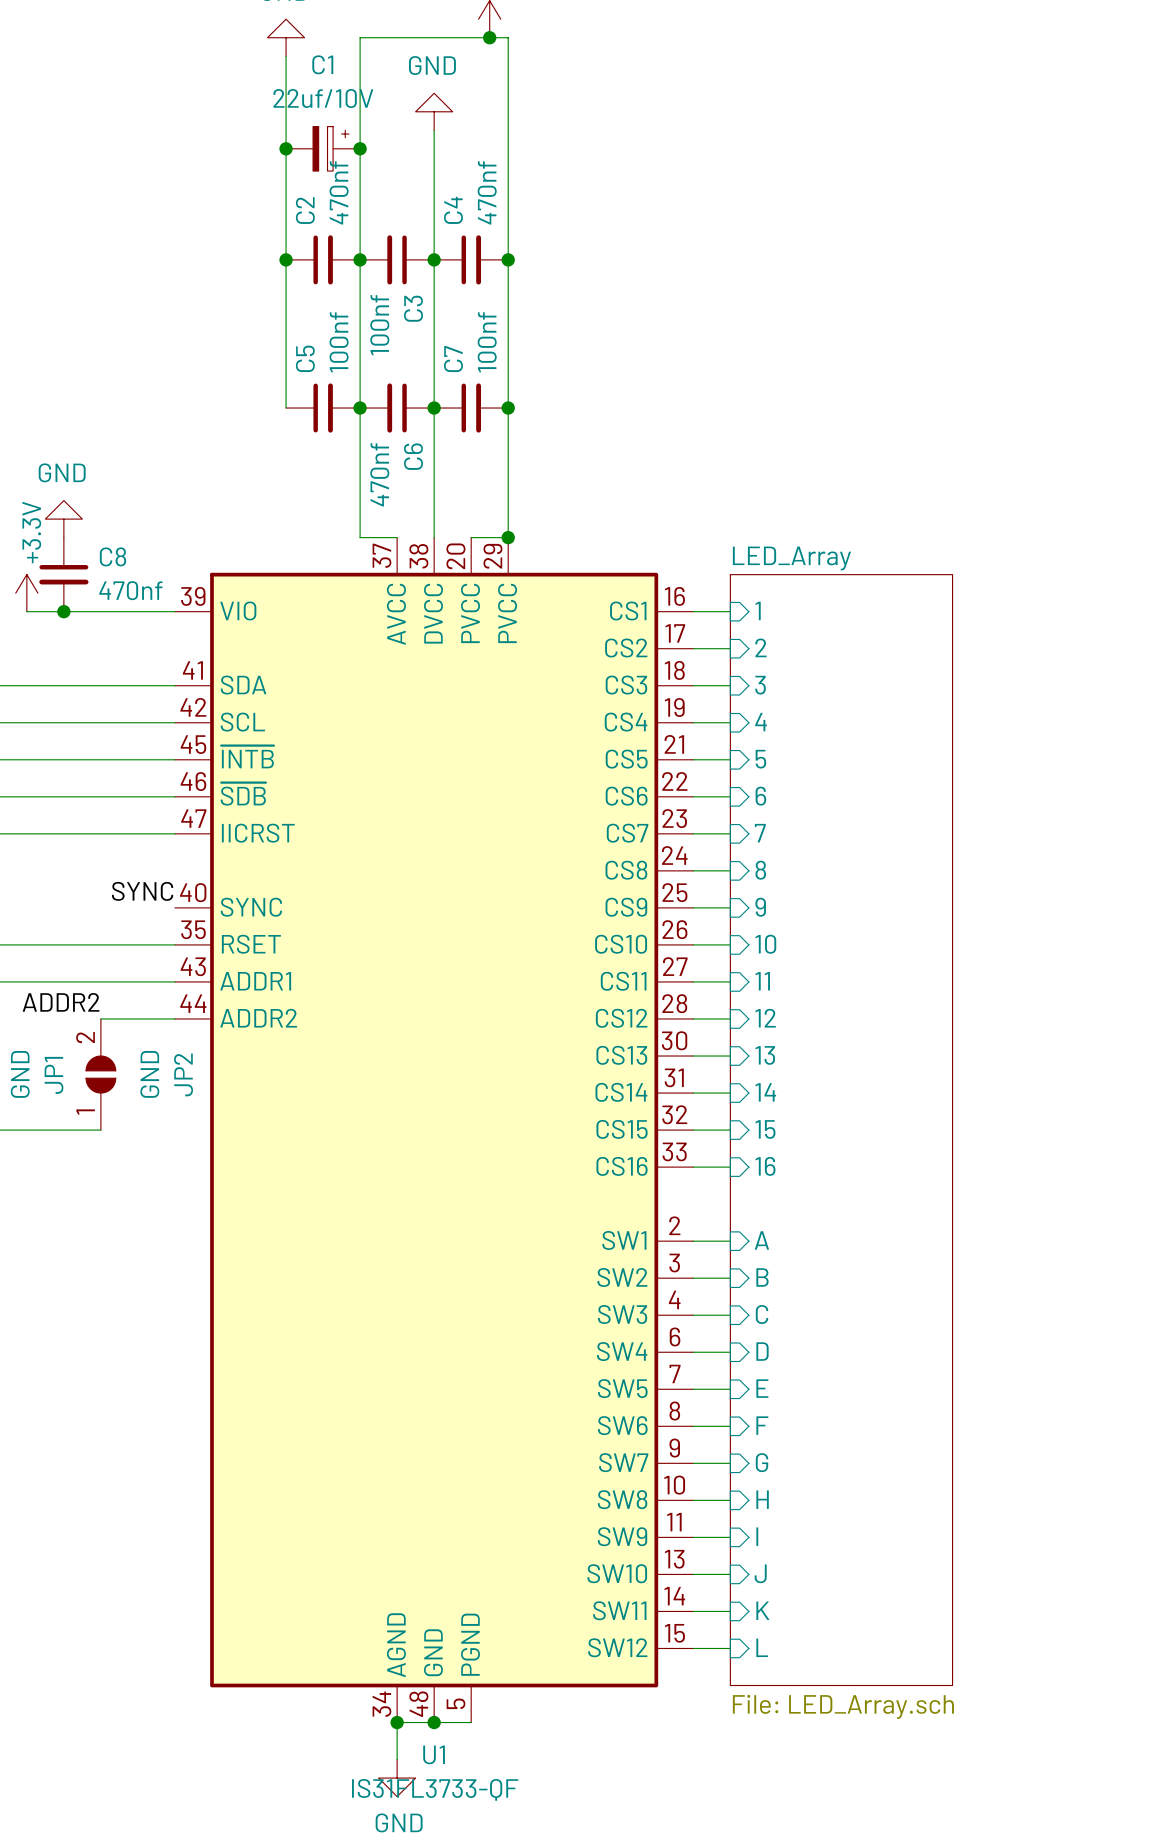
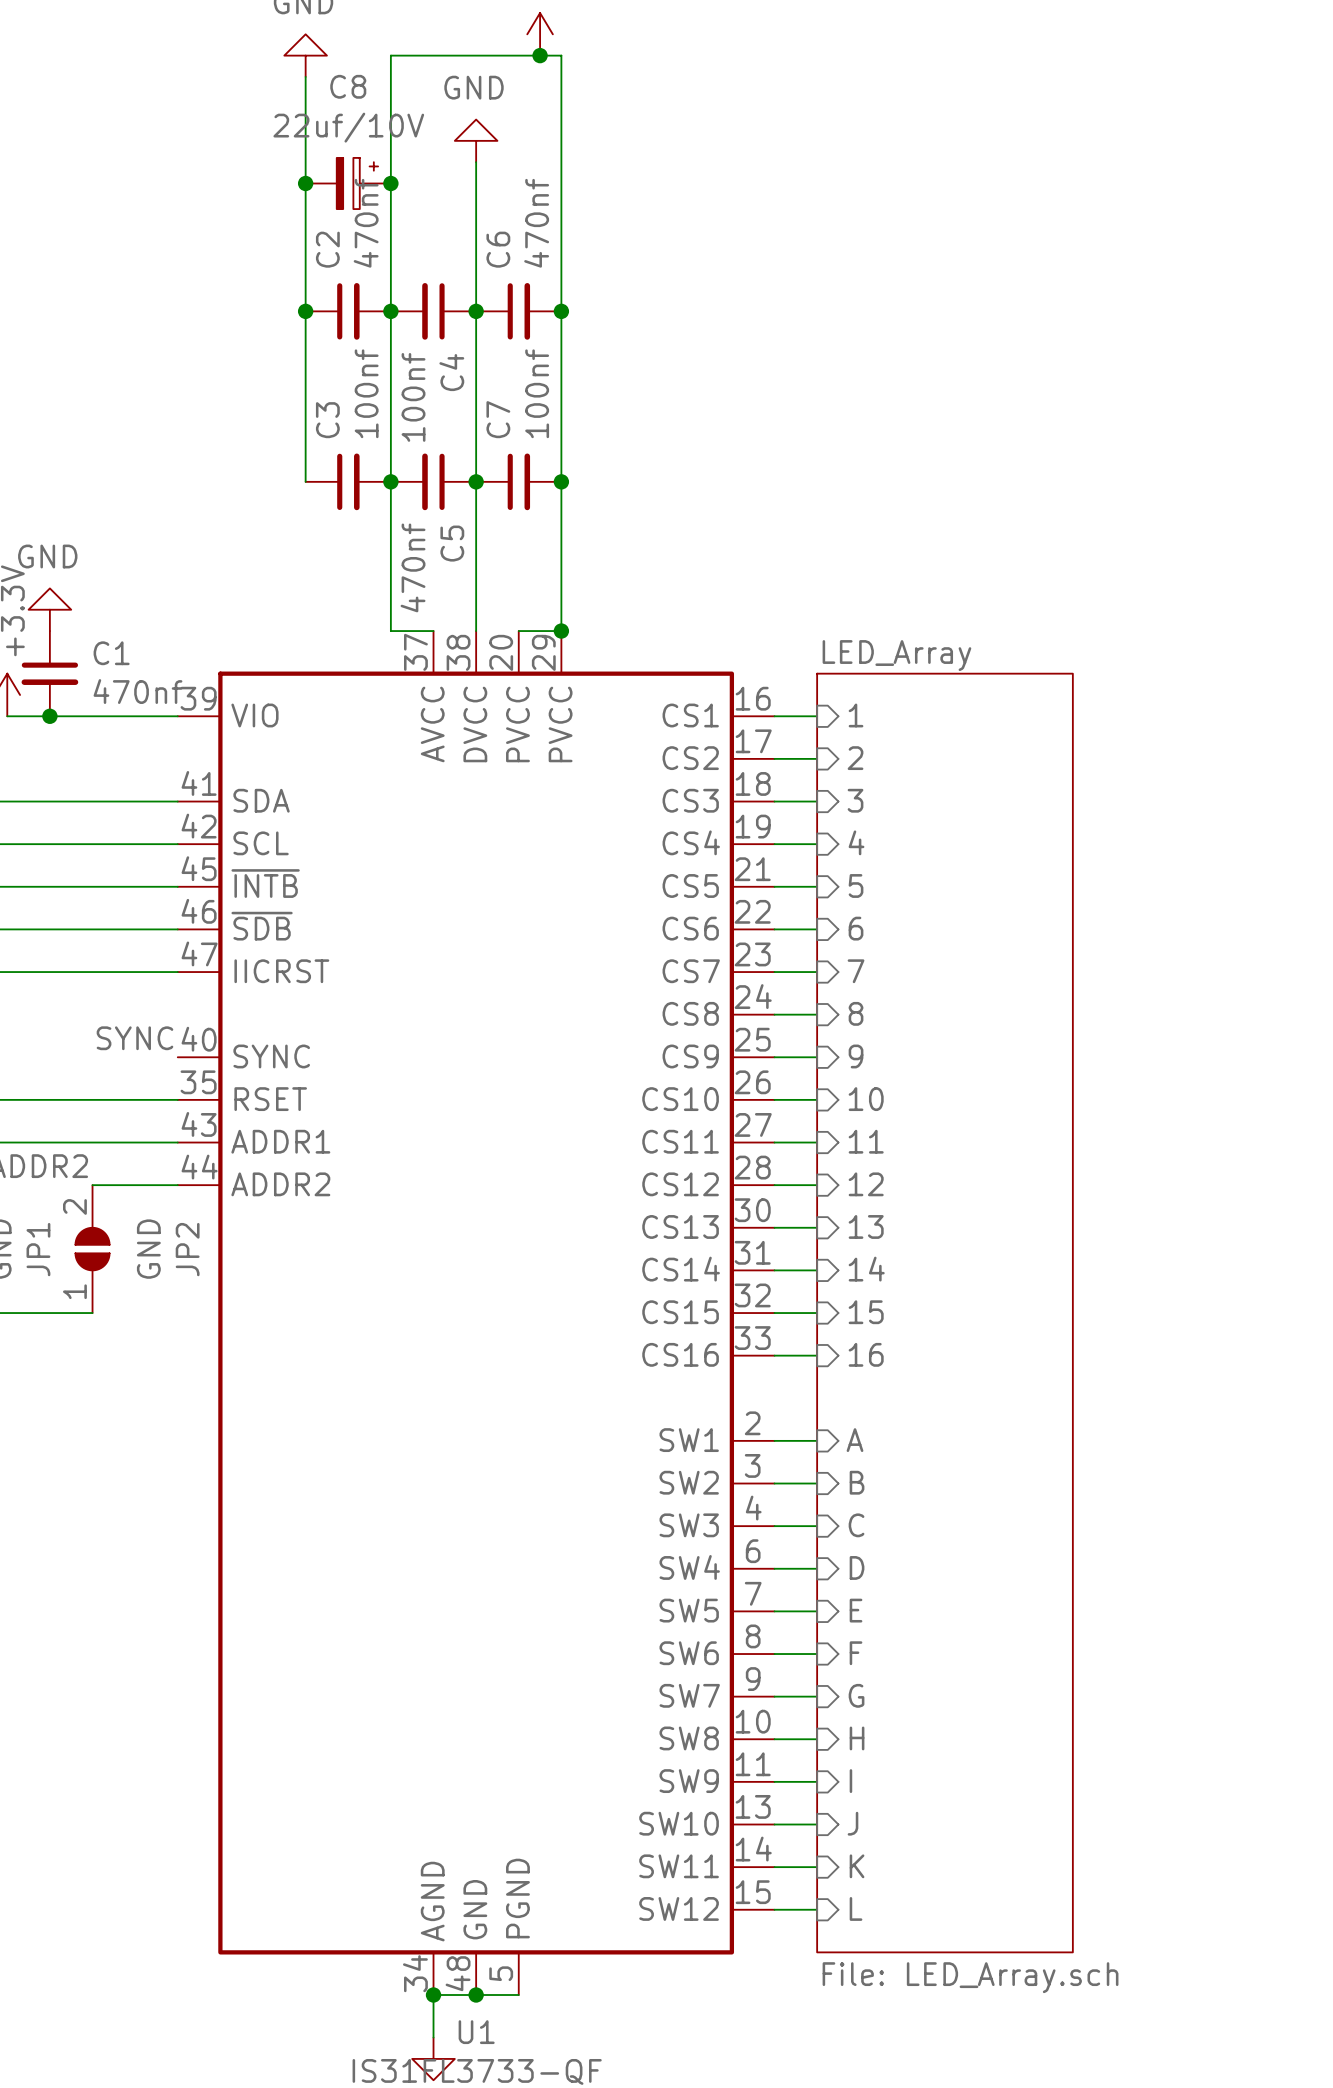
C1 name: C1 (322, 64) -> C8 (348, 86)
C4 name: C4 (453, 210) -> C6 (498, 249)
C3 name: C3 (413, 308) -> C4 (451, 372)
C5 name: C5 (305, 358) -> C3 (327, 420)
C6 name: C6 (413, 456) -> C5 (452, 543)
C8 name: C8 (113, 556) -> C1 (111, 653)

